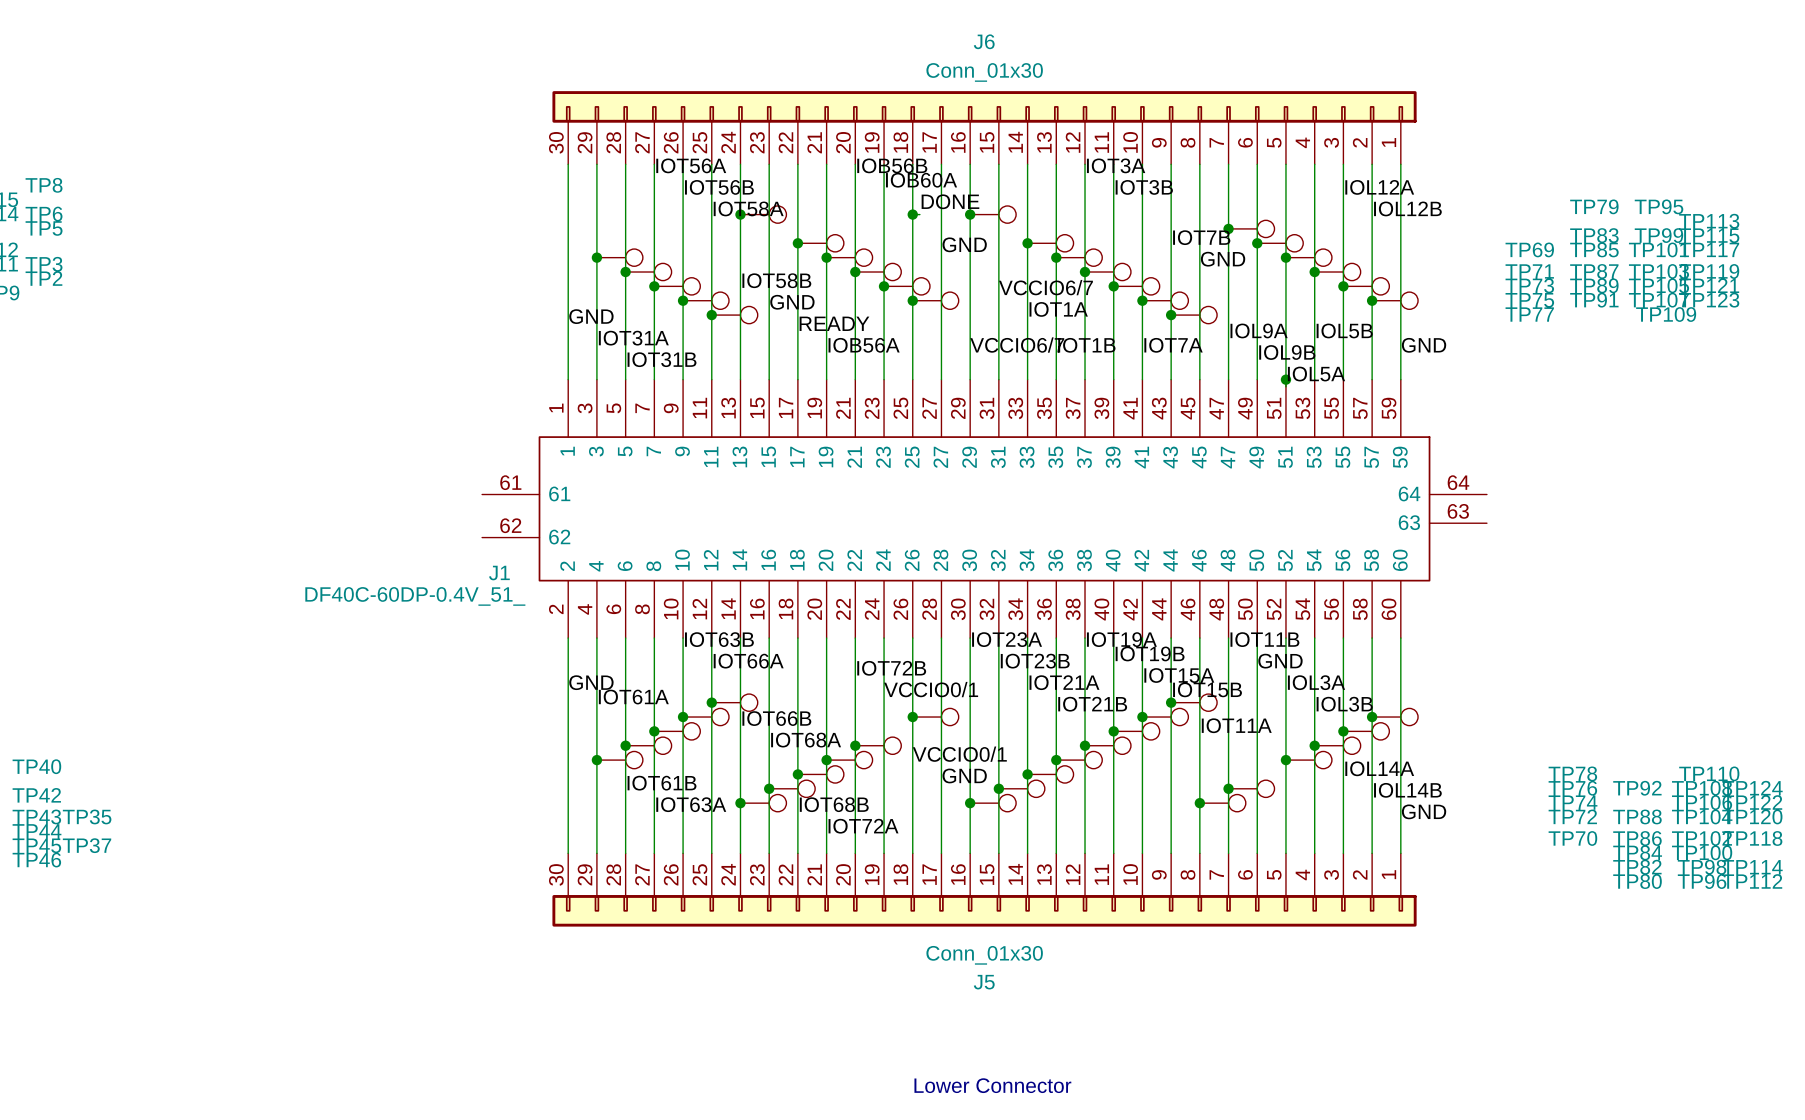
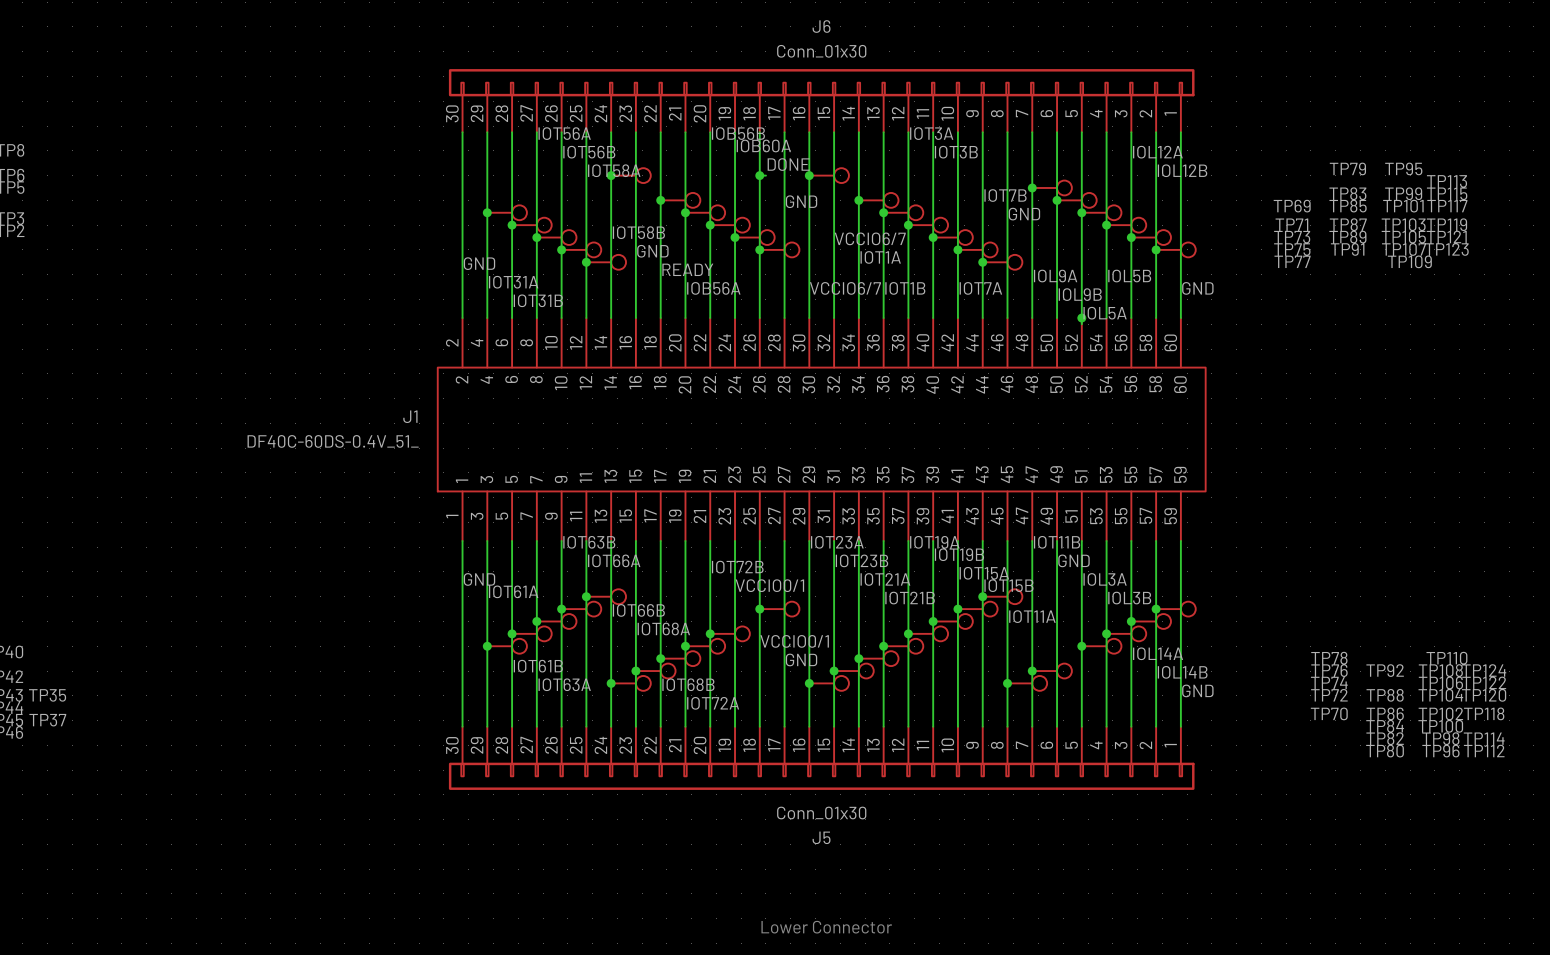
J1 symbol: [482, 379, 1487, 639] -> [437, 318, 1207, 541]
J1 name position: J1 (499, 573) -> J1 (410, 416)
J1 value: DF40C-60DP-0.4V_51_ (415, 596) -> DF40C-60DS-0.4V_51_ (333, 441)

